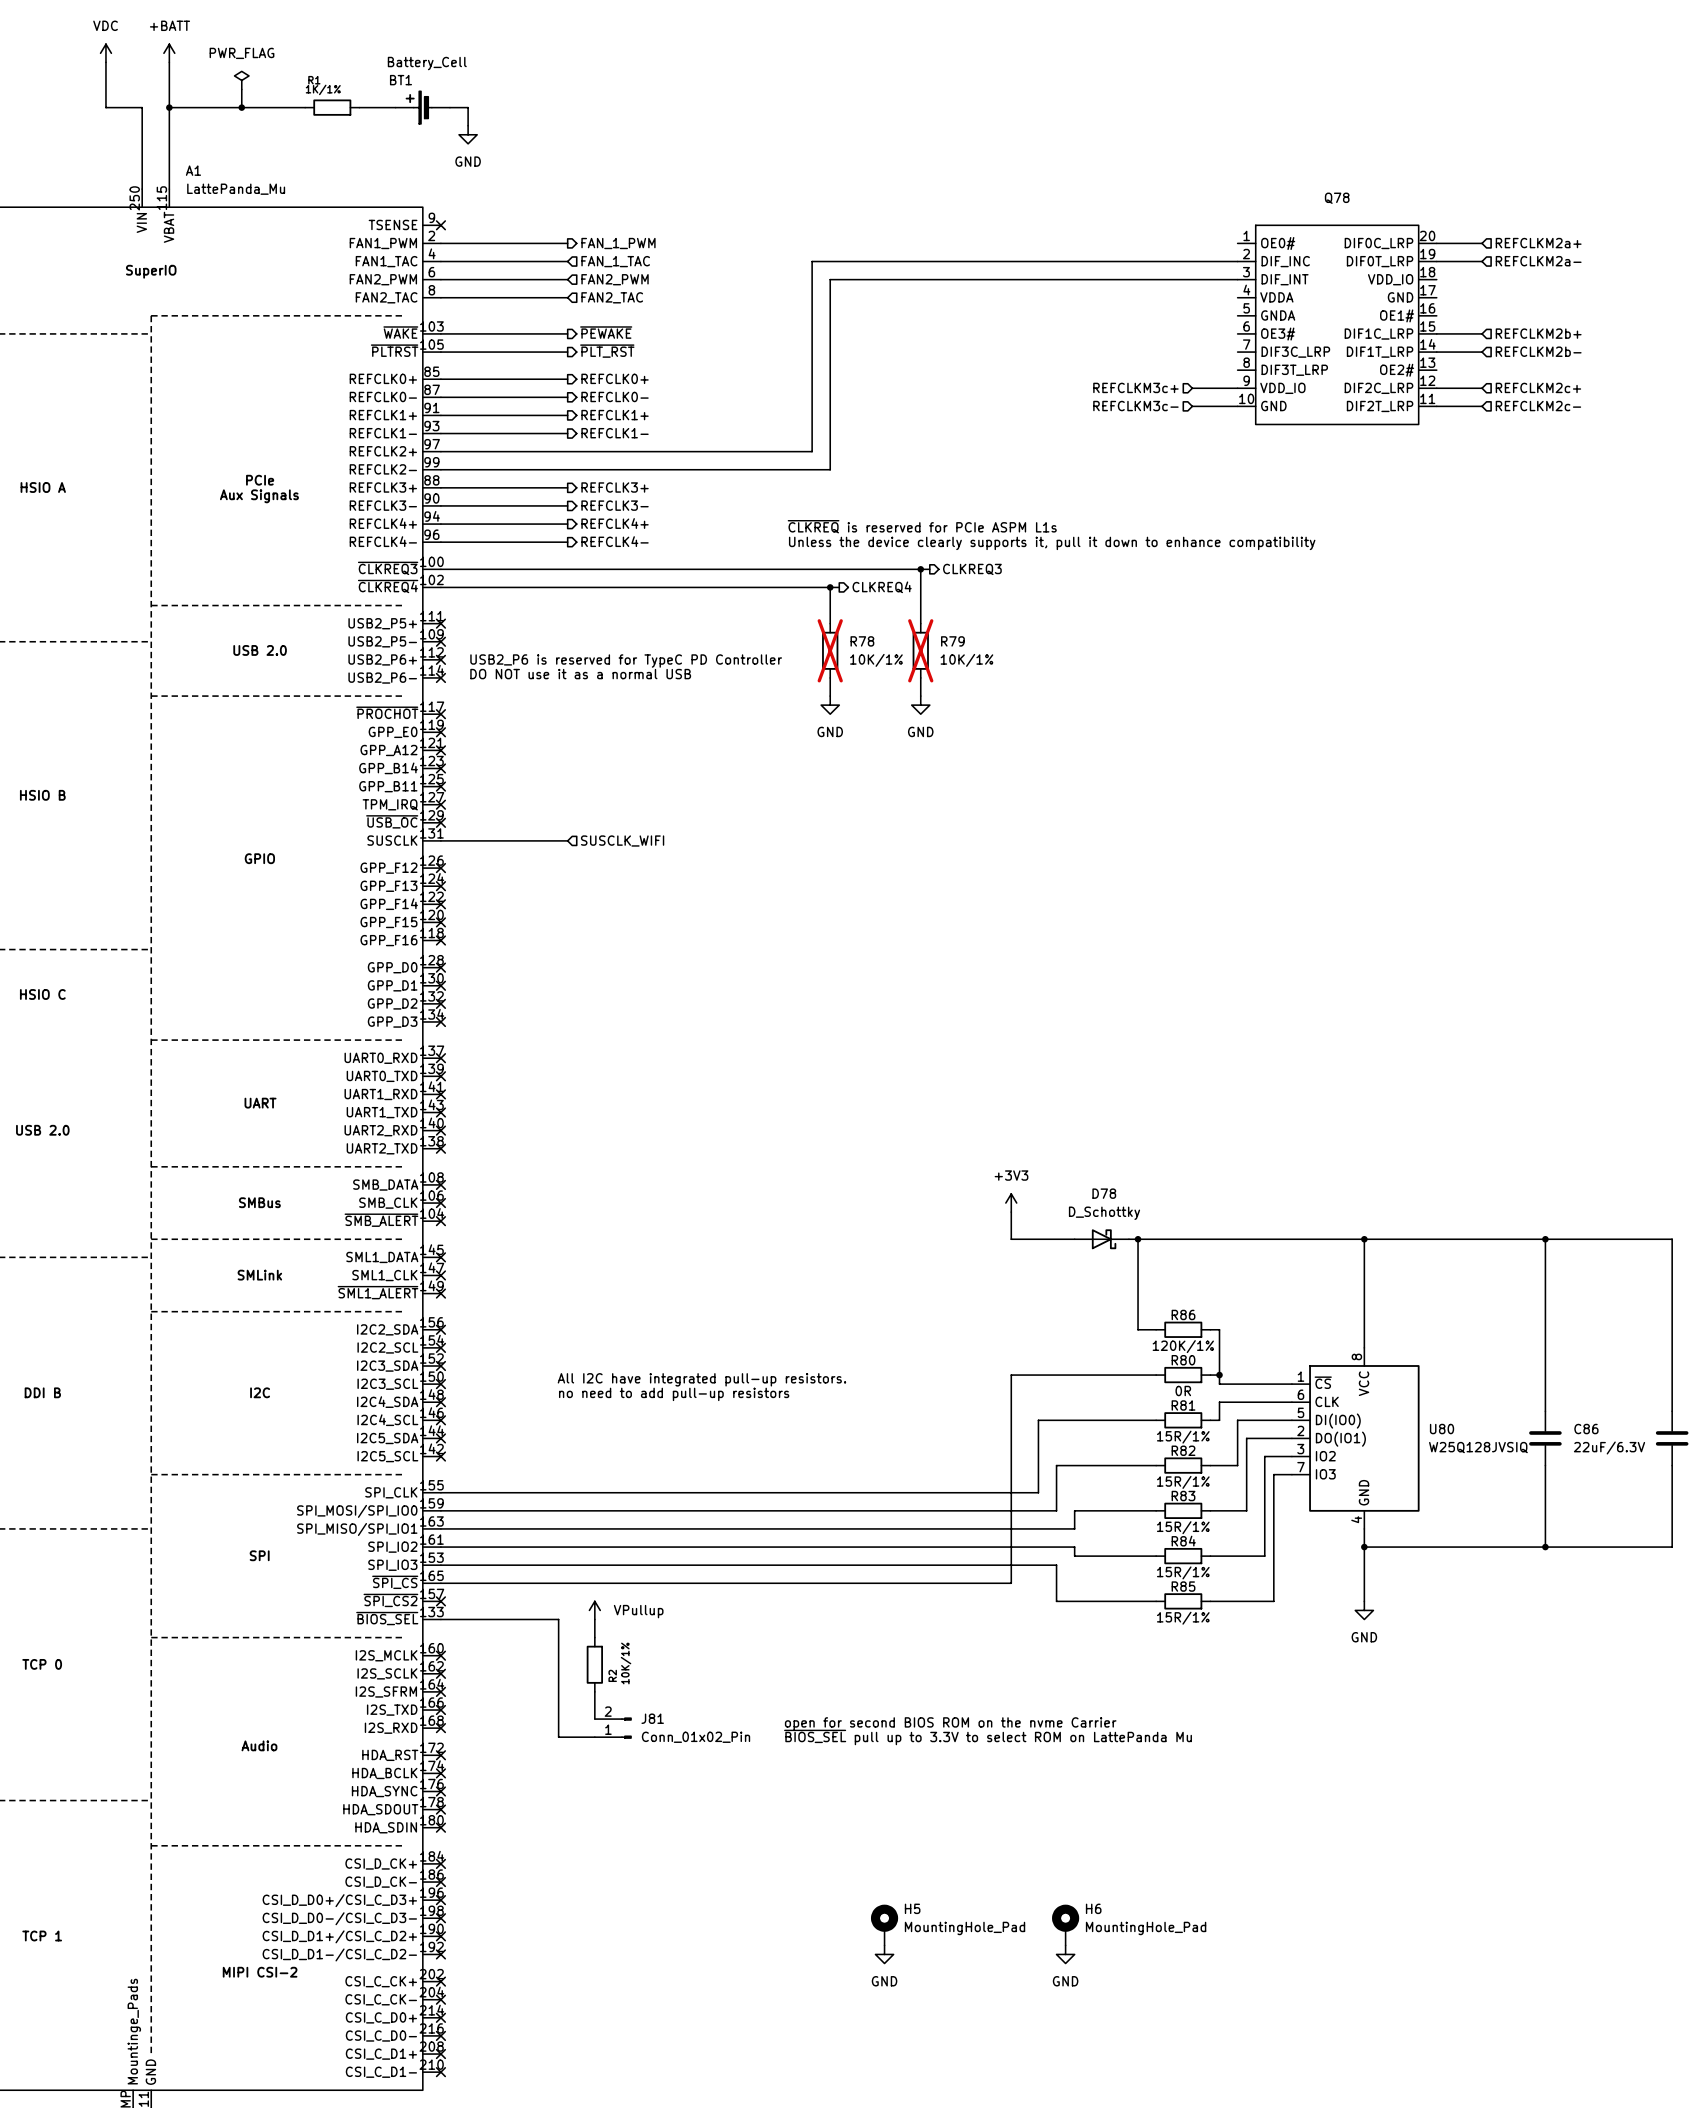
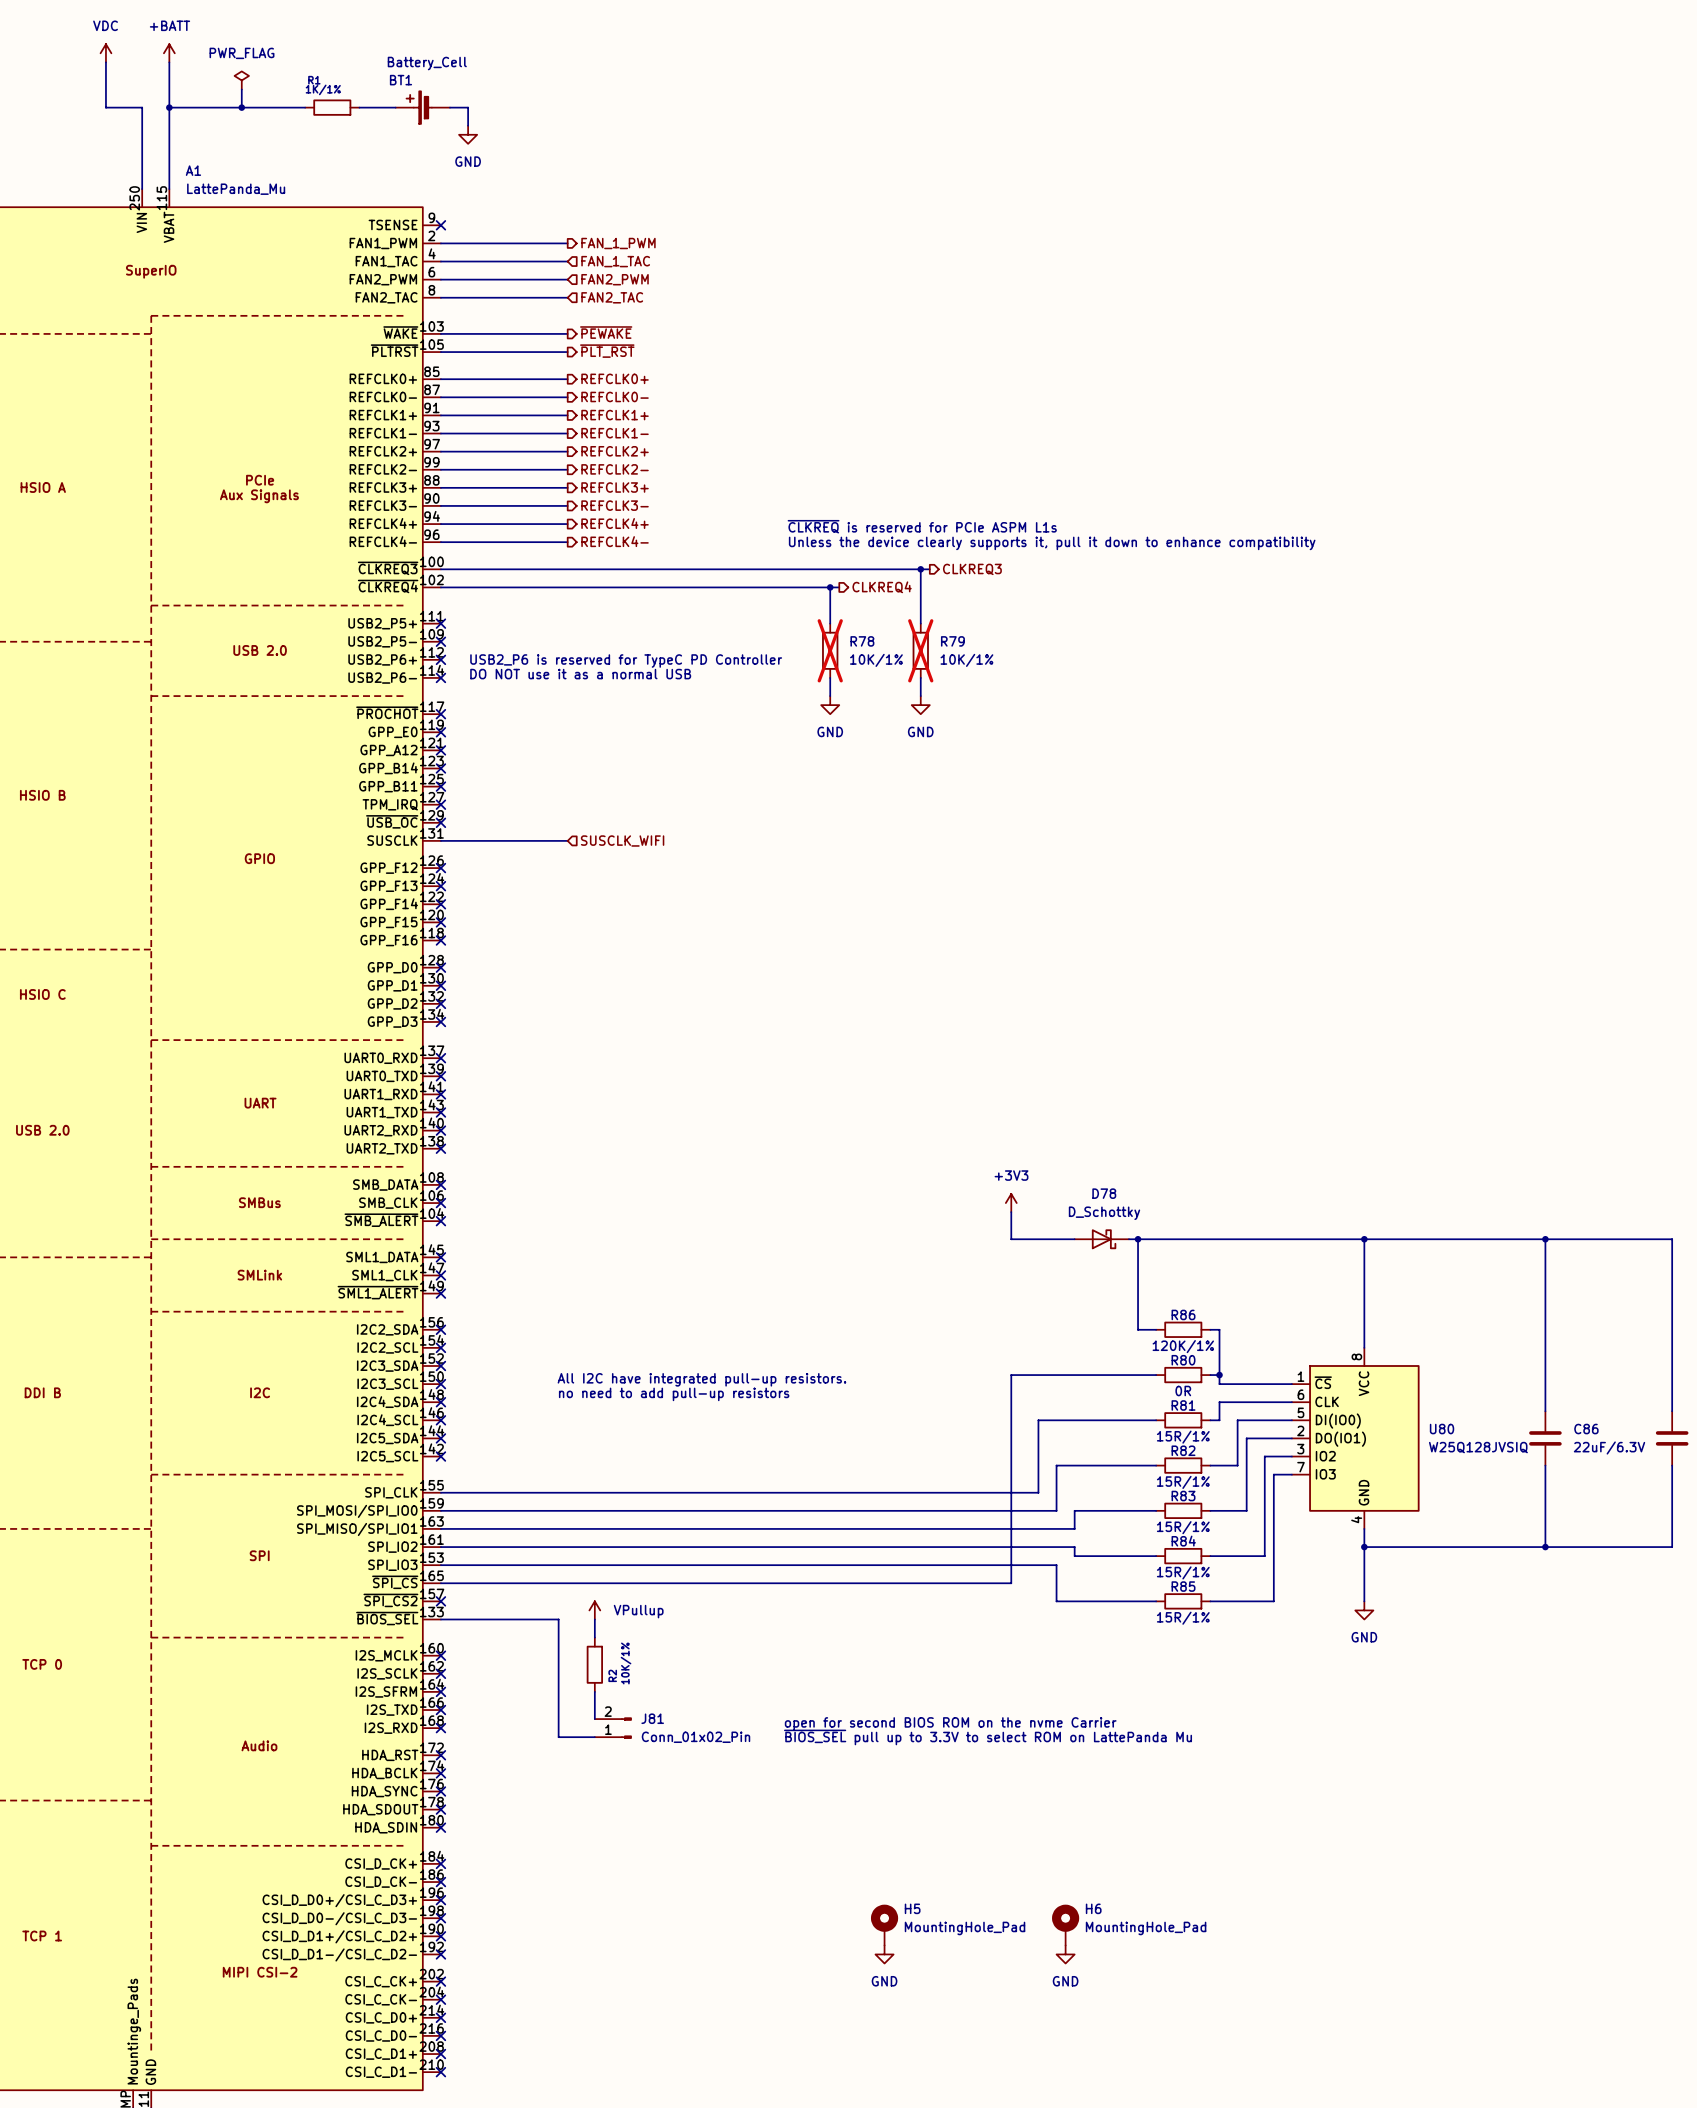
wire: (1436, 243) (1482, 243) -> none
hierarchical label: REFCLKM2a+ (1538, 243) -> none
wire: (1237, 261) (812, 261) (812, 451) (567, 451) -> none
wire: (1436, 261) (1482, 261) -> none
hierarchical label: REFCLKM2a- (1538, 261) -> none
wire: (1237, 279) (830, 279) (830, 469) (567, 469) -> none
Q78: (1337, 324) -> none
wire: (1436, 333) (1482, 333) -> none
hierarchical label: REFCLKM2b+ (1538, 333) -> none
hierarchical label: REFCLKM2b- (1538, 351) -> none
wire: (1436, 352) (1482, 352) -> none
hierarchical label: REFCLKM3c+ (1135, 387) -> none
hierarchical label: REFCLKM2c+ (1538, 387) -> none
wire: (1192, 388) (1237, 388) -> none
wire: (1436, 388) (1482, 388) -> none
hierarchical label: REFCLKM3c- (1135, 406) -> none
wire: (1192, 406) (1237, 406) -> none
wire: (1436, 406) (1482, 406) -> none
hierarchical label: REFCLKM2c- (1538, 406) -> none
hierarchical label: none -> REFCLK2+ (615, 451)
hierarchical label: none -> REFCLK2- (615, 469)

